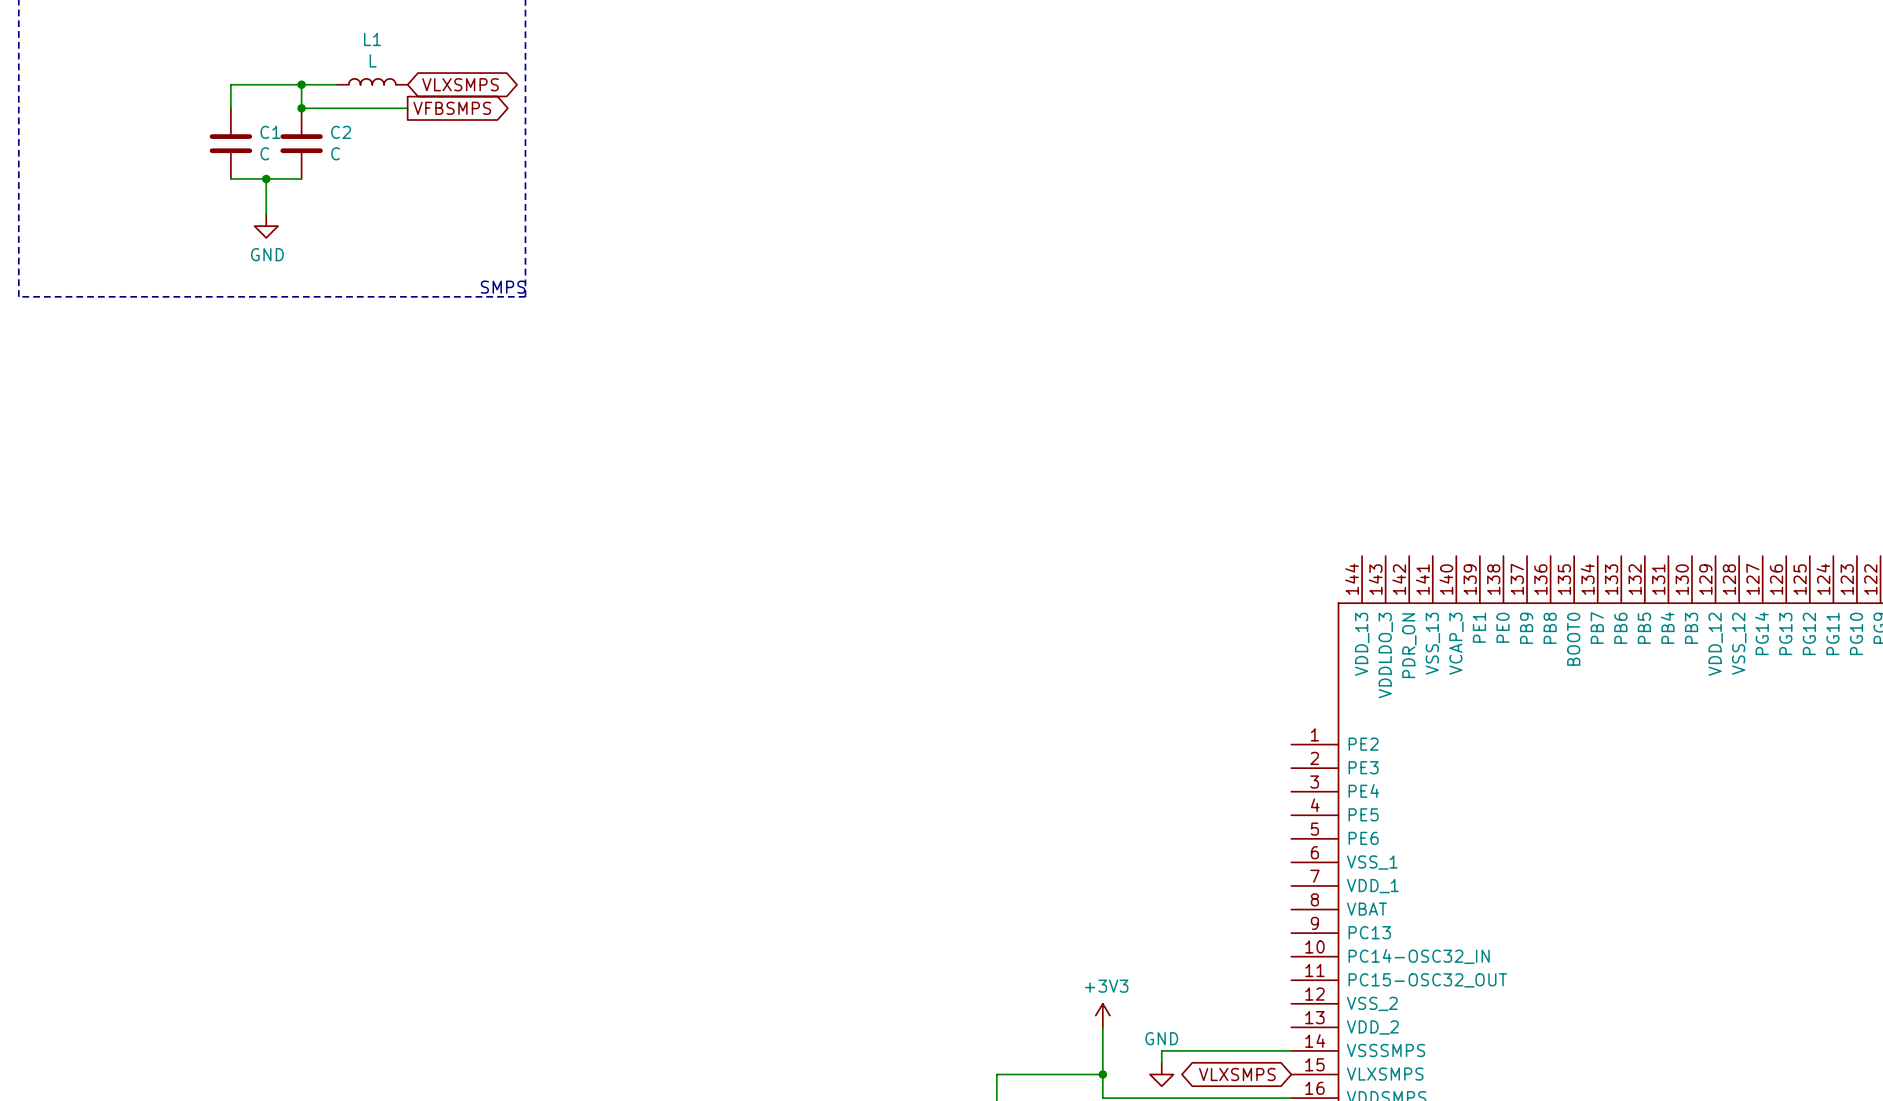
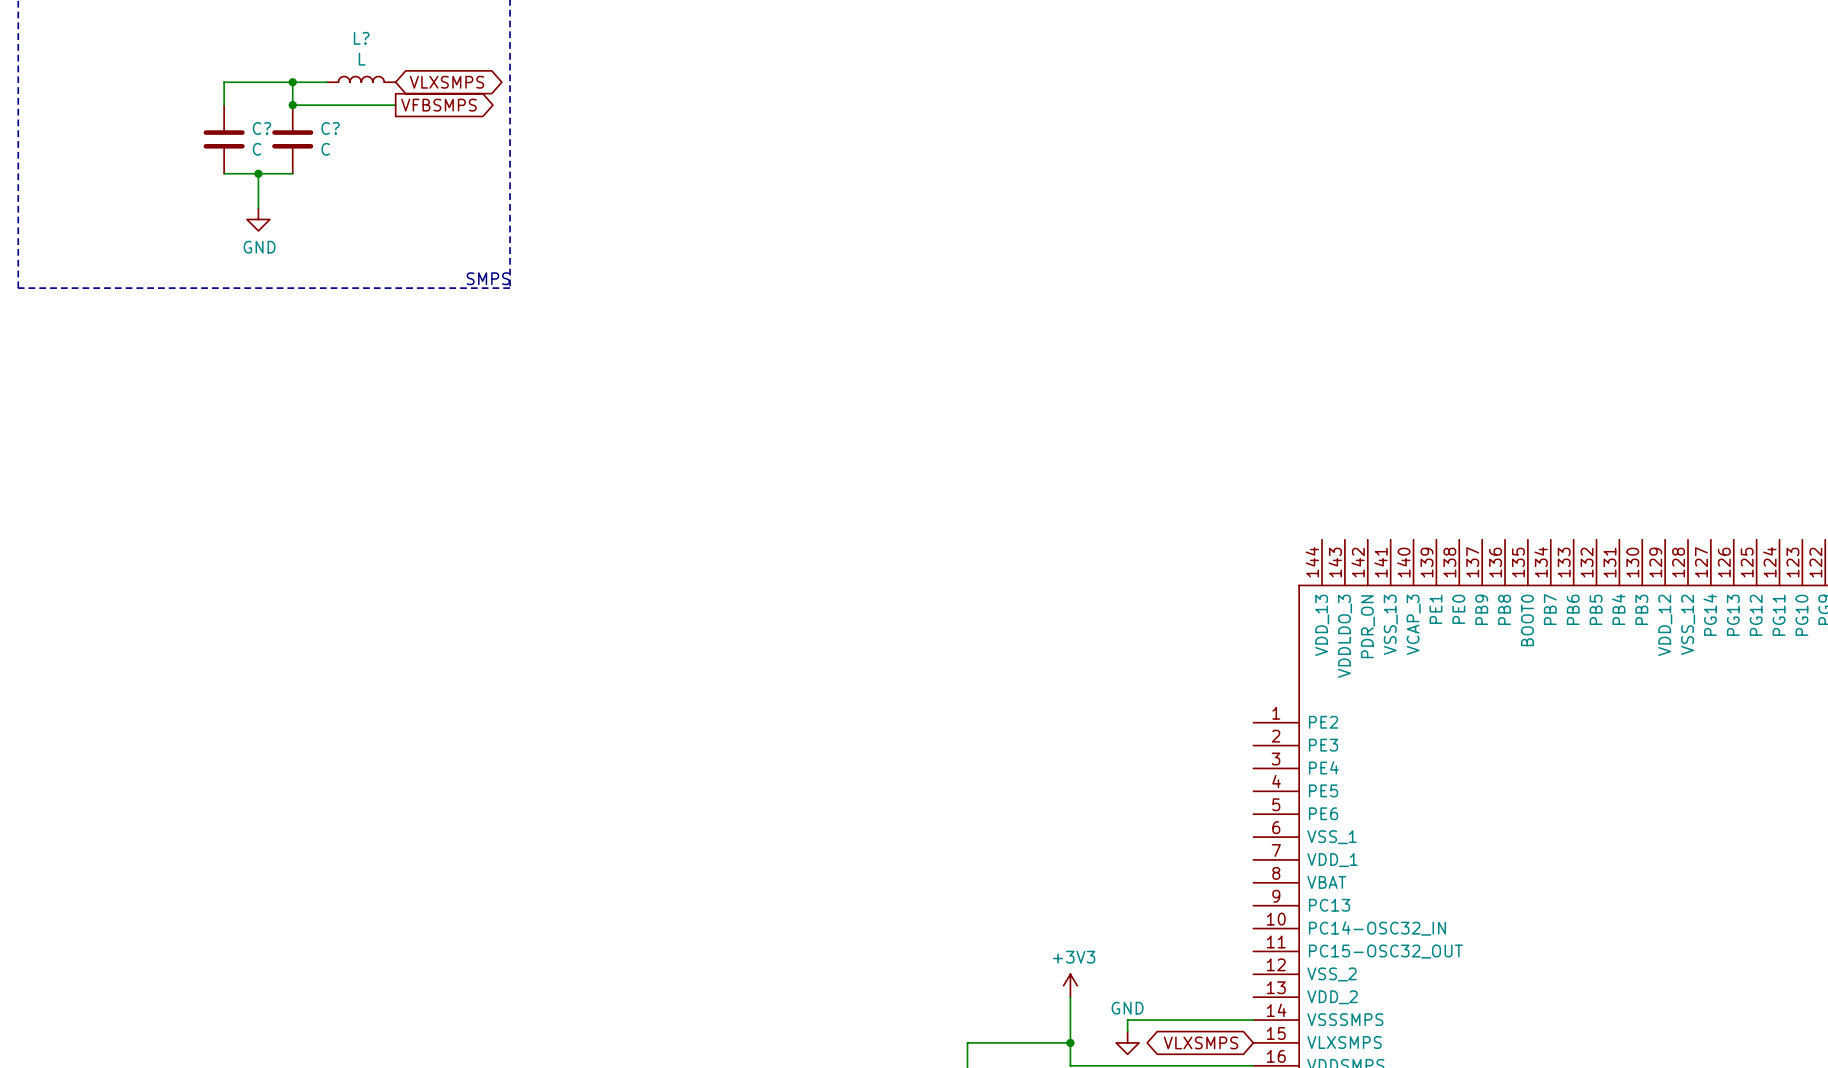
L1 name: L1 (372, 39) -> L? (361, 38)
C1 name: C1 (270, 132) -> C? (261, 128)
C2 name: C2 (341, 132) -> C? (330, 128)

